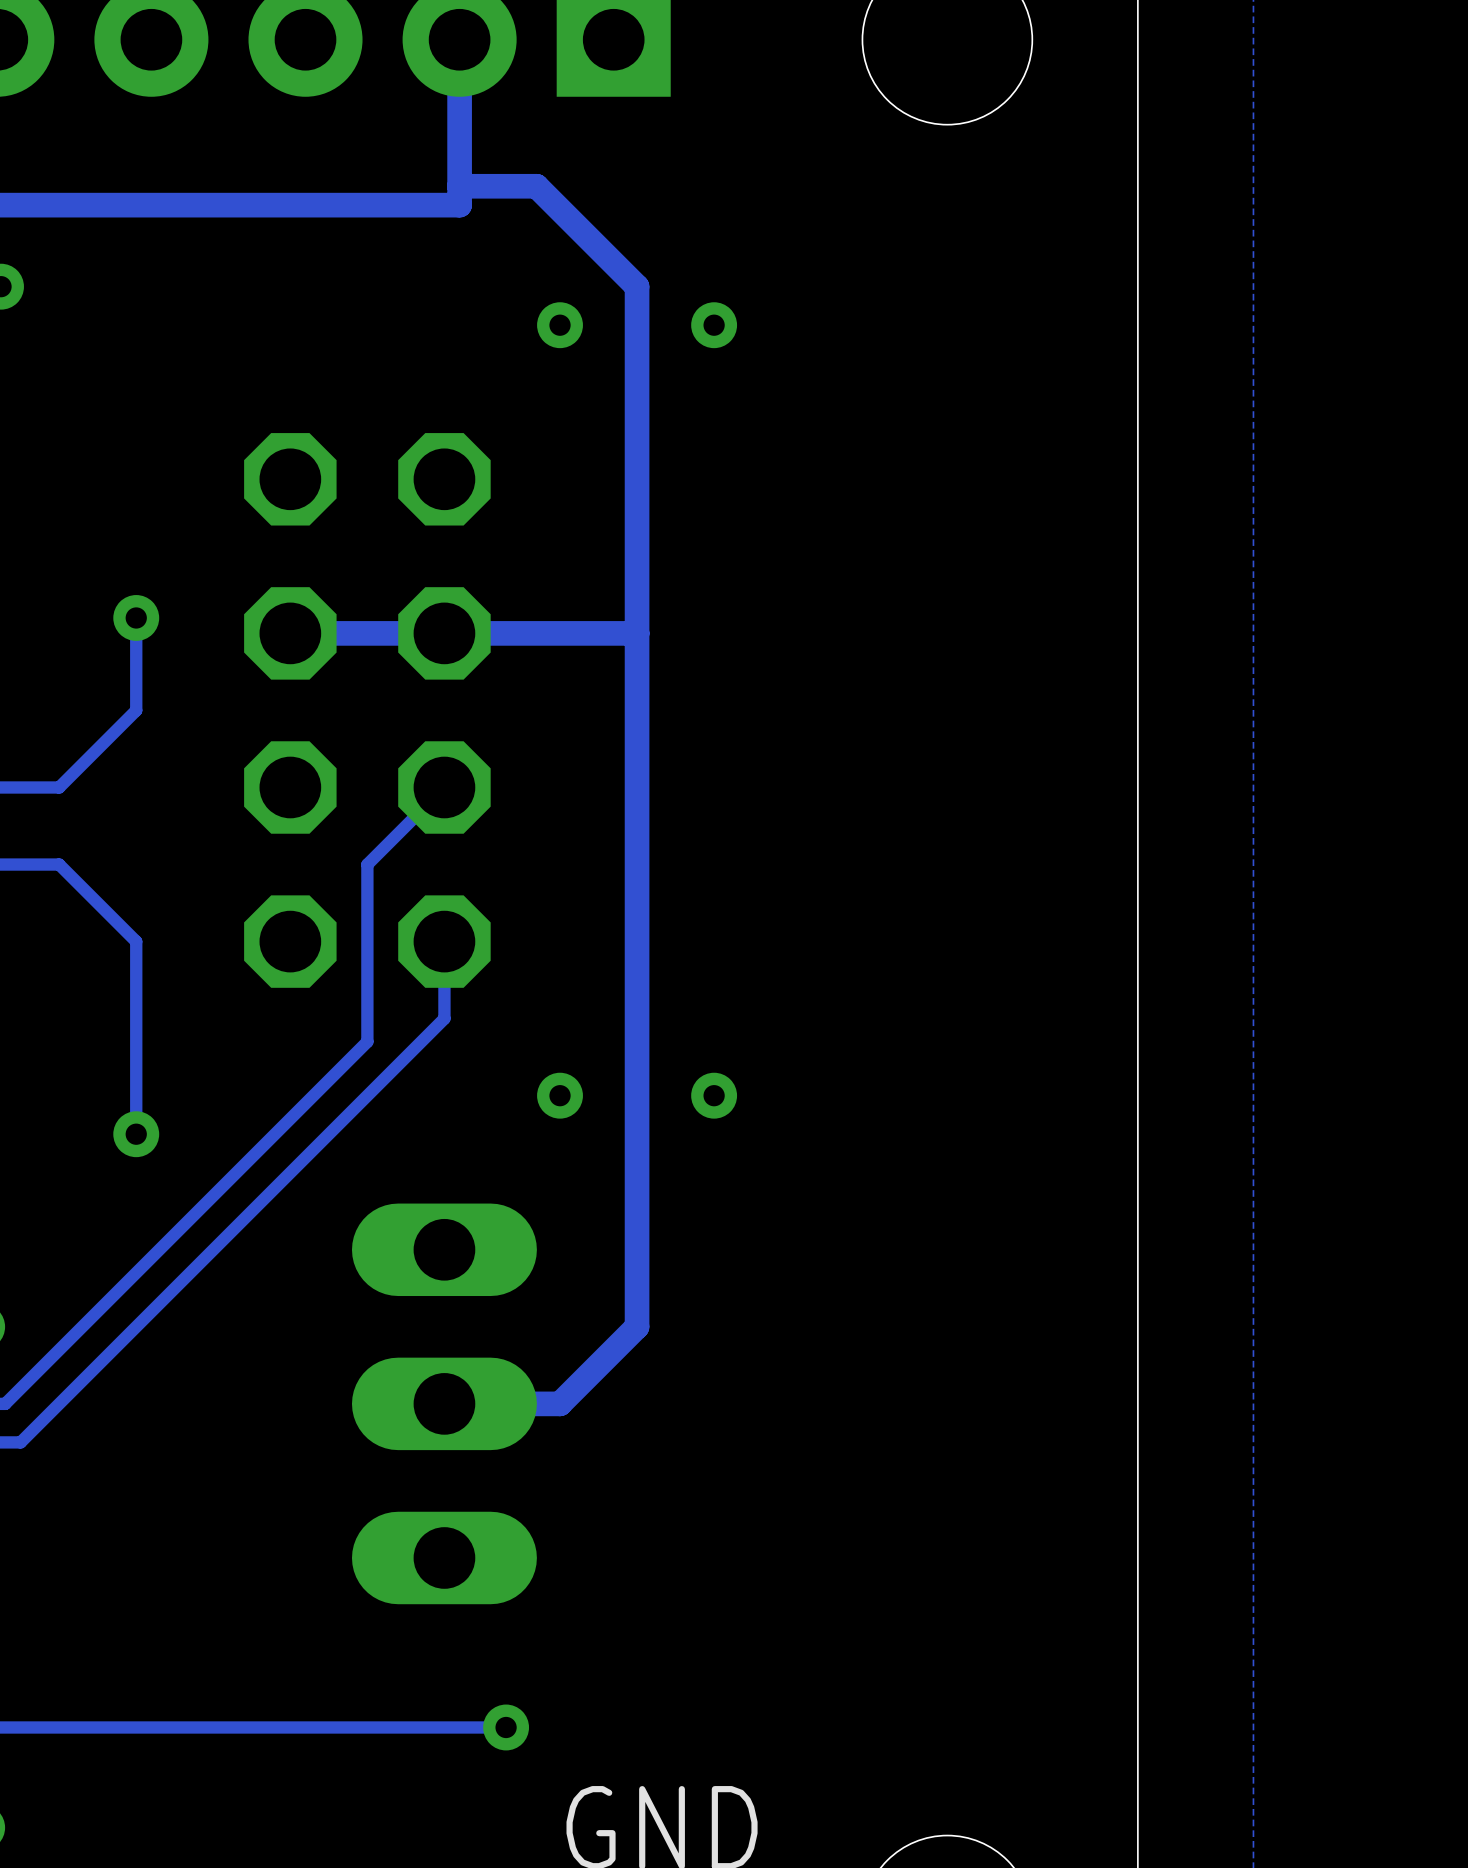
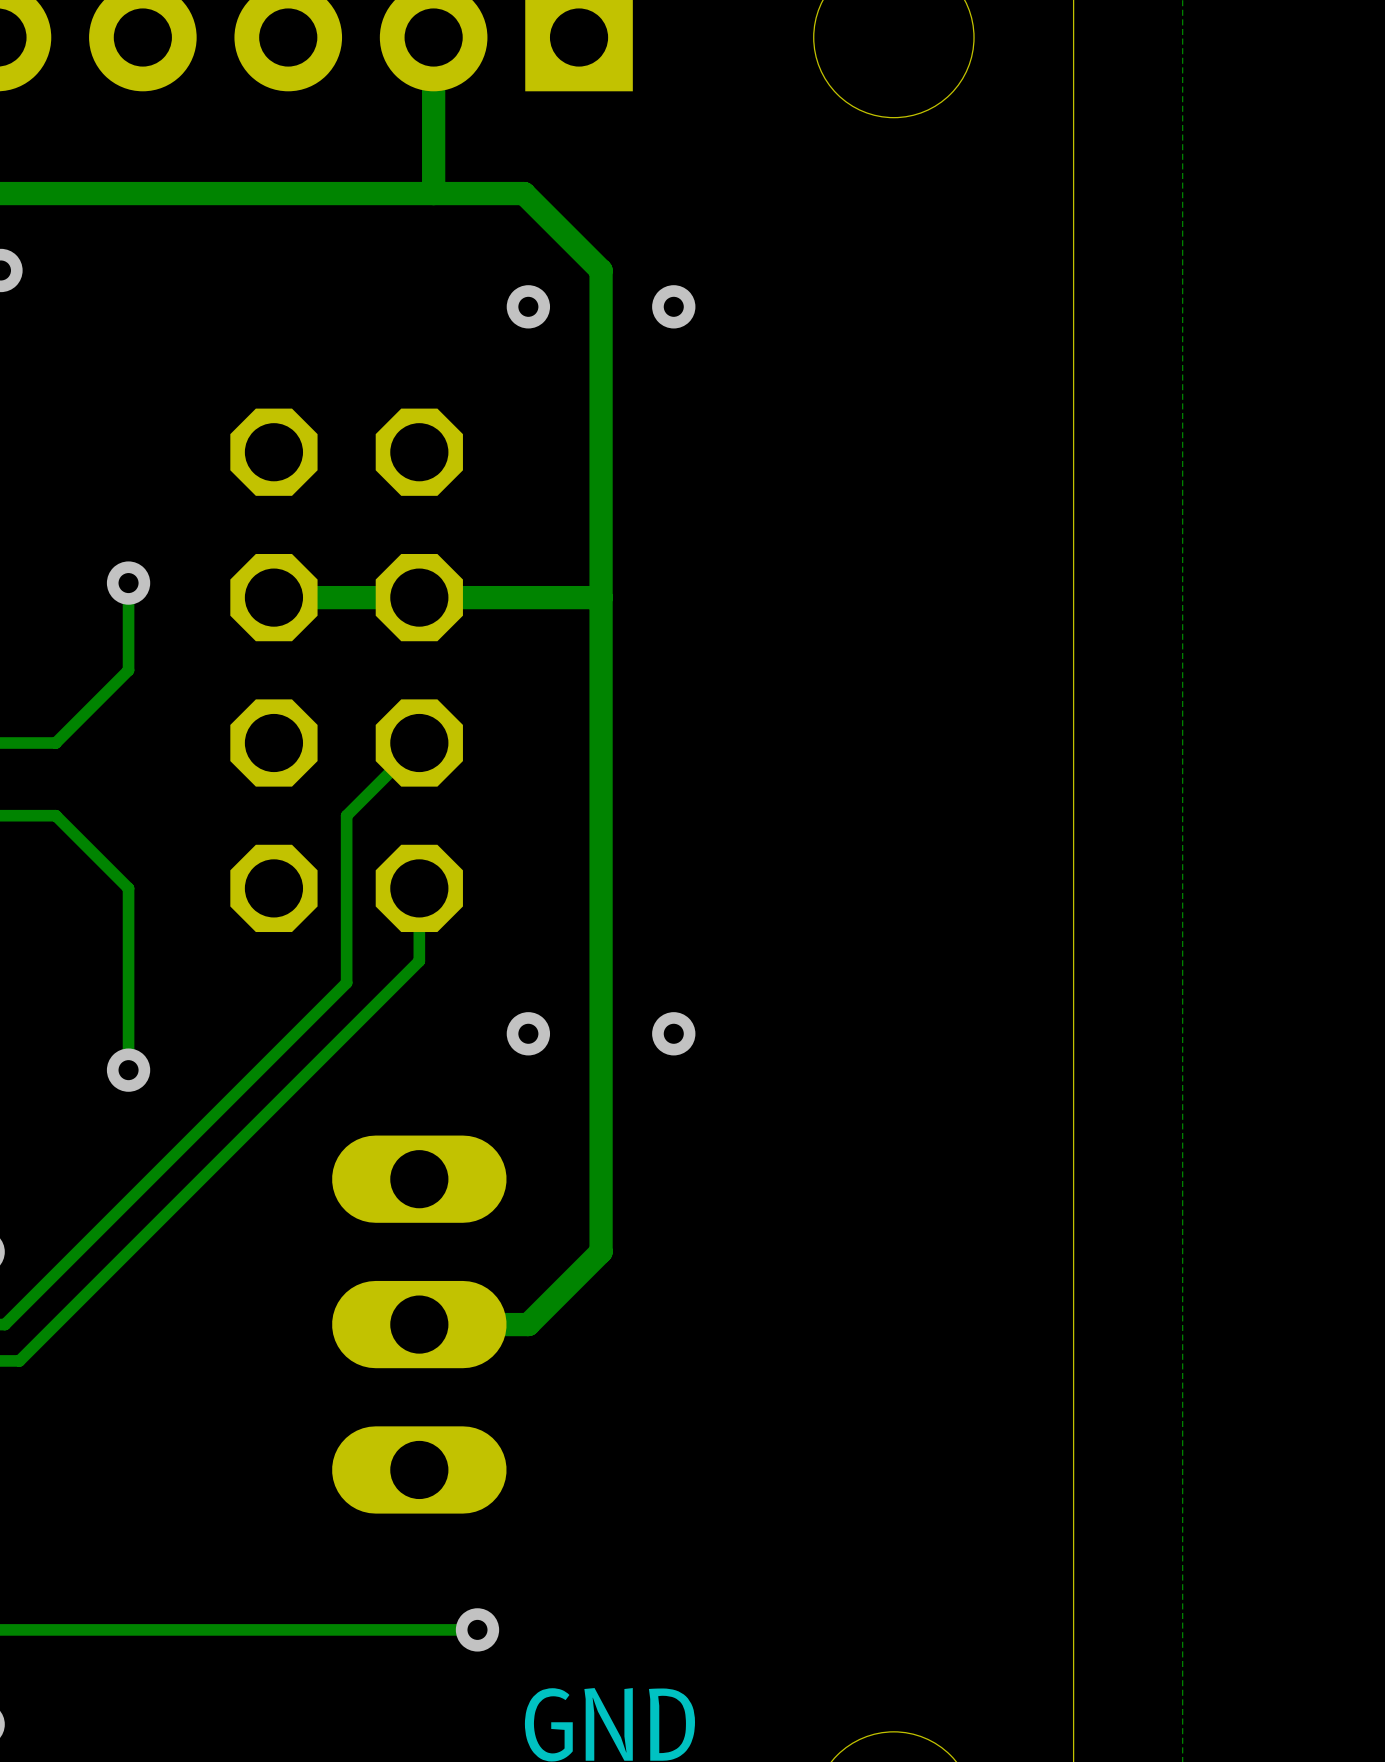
track: (459, 186) (536, 186) (555, 205) -> (433, 193) (524, 193)

